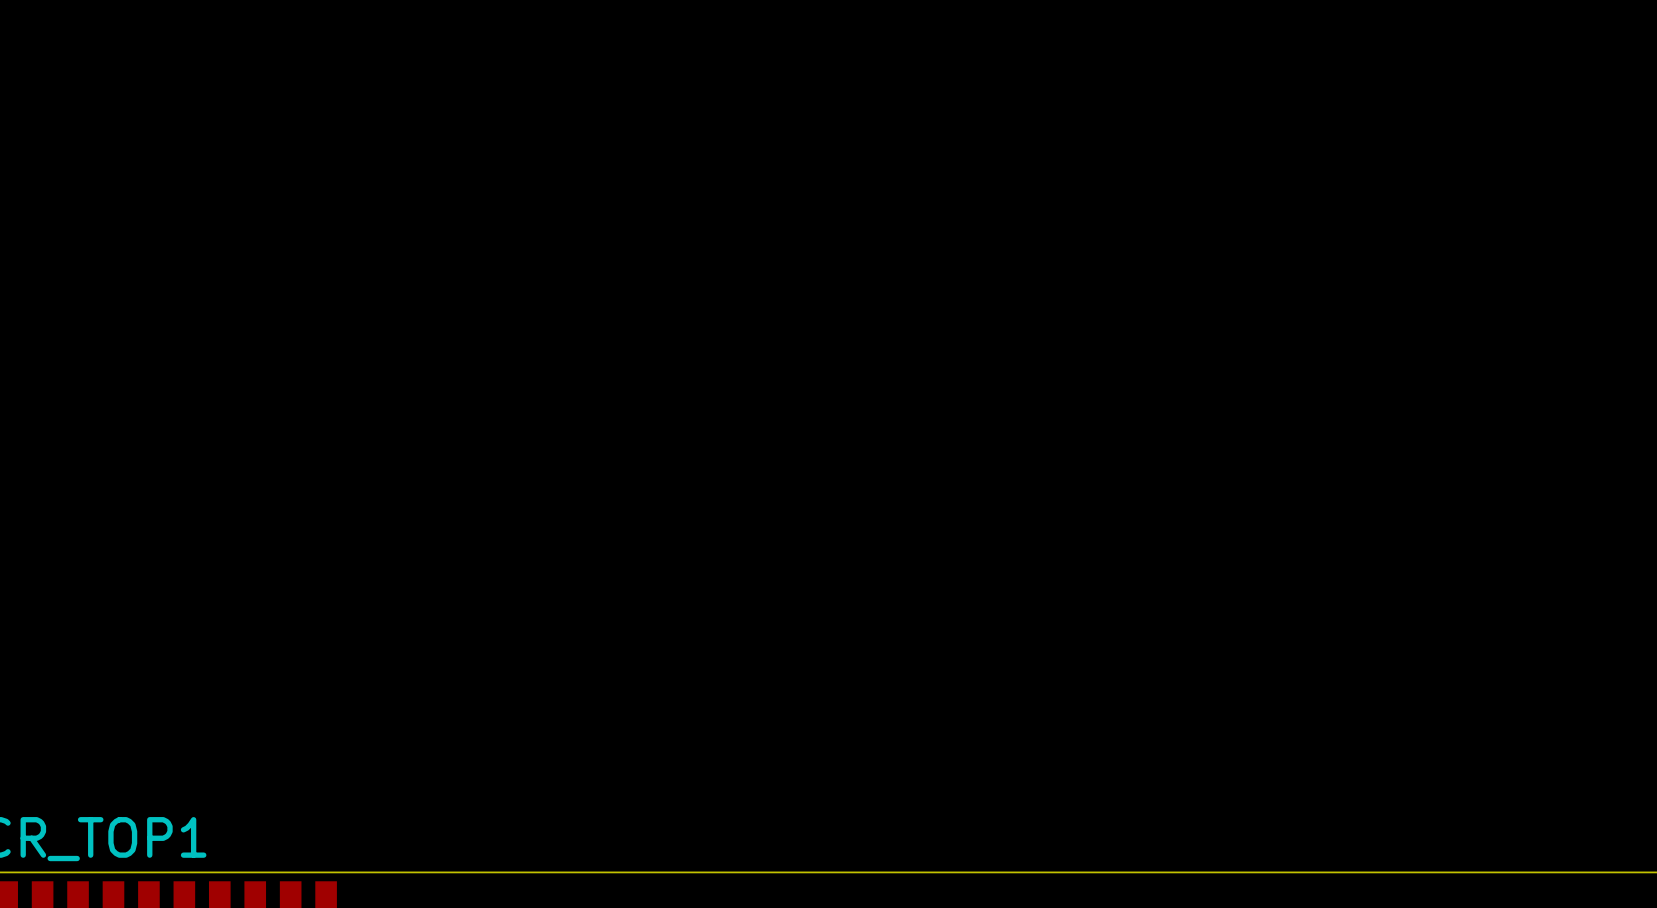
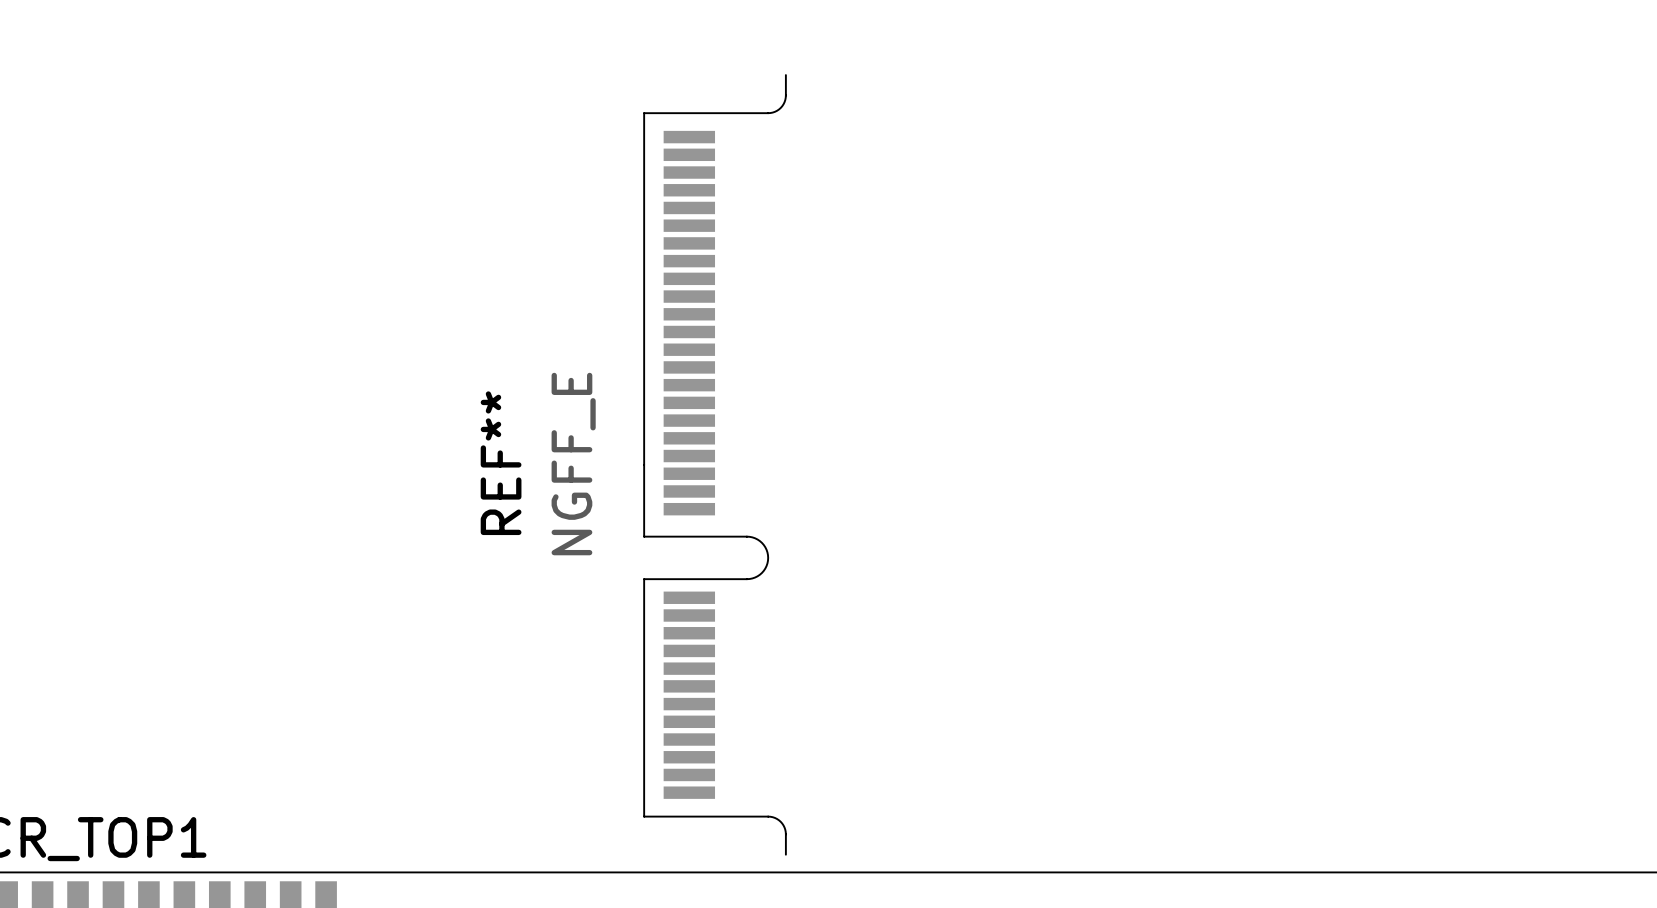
REF**: none -> NGFF_E (715, 464)

